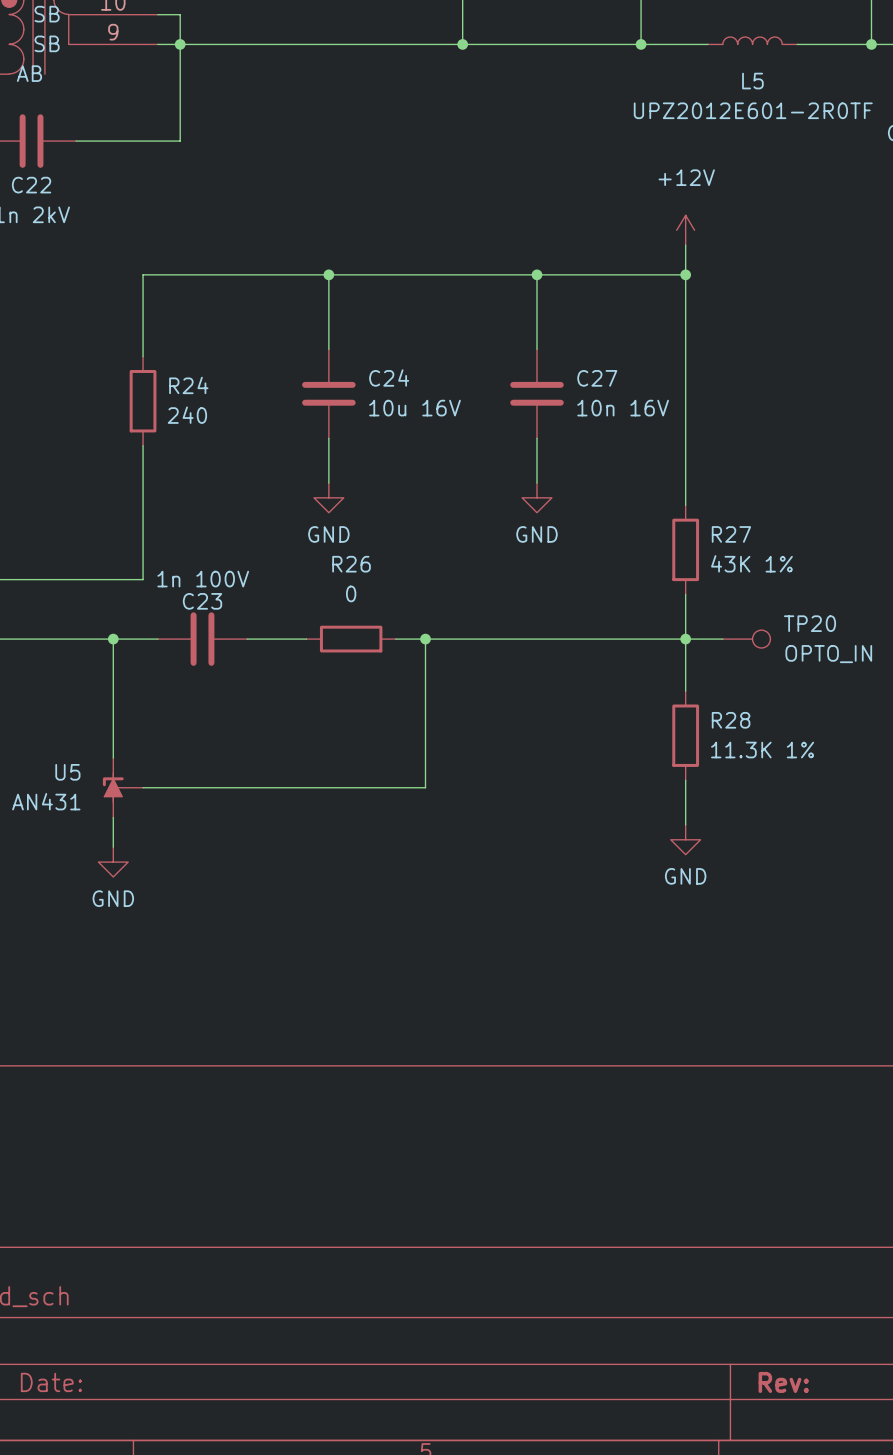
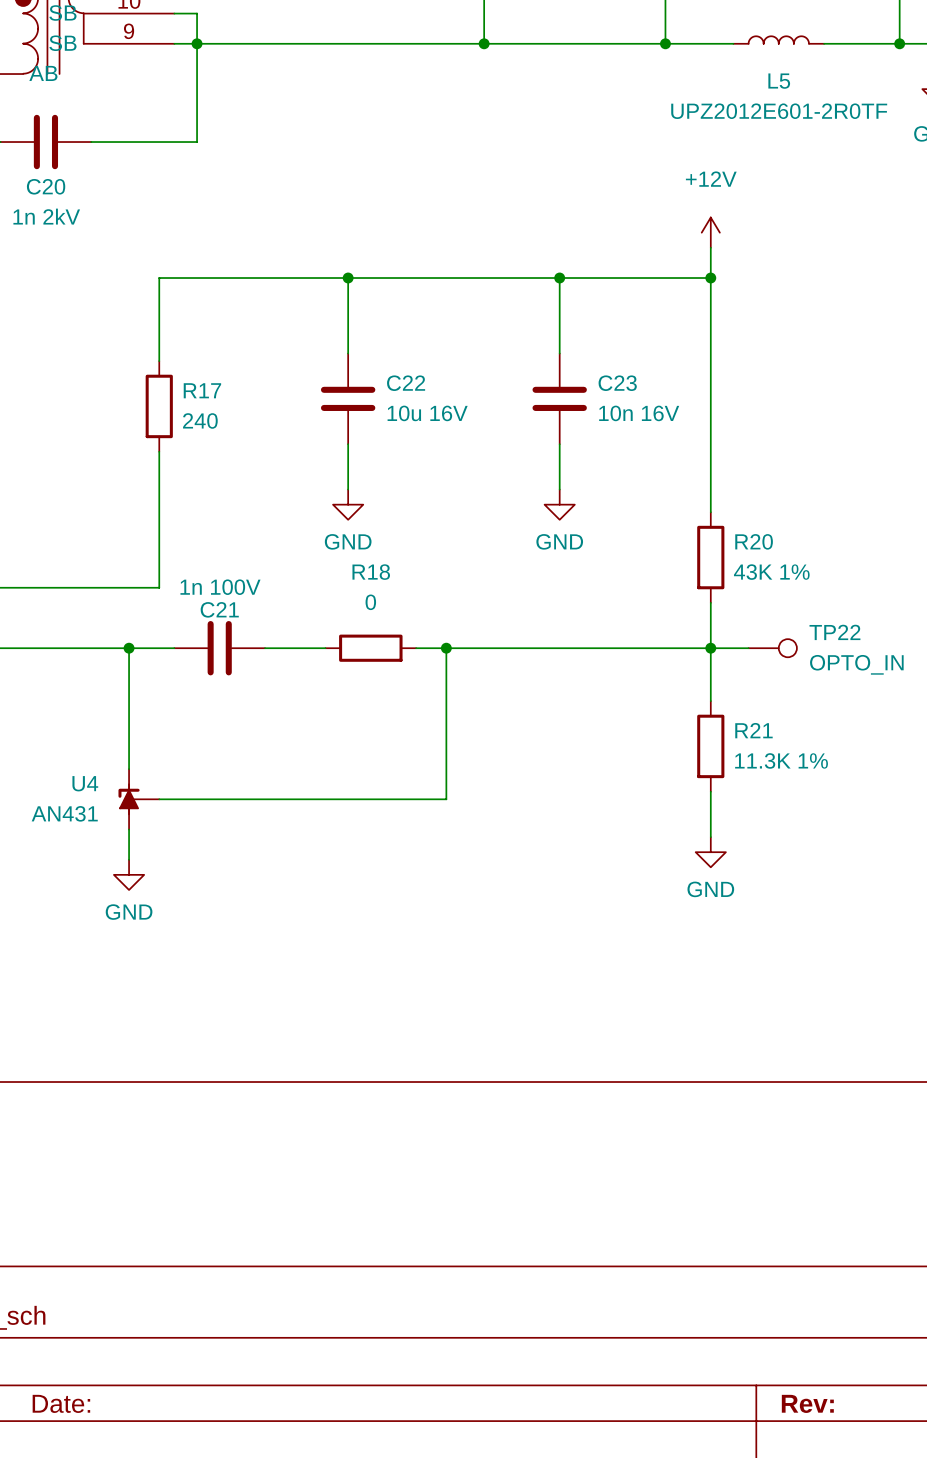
C22 name: C22 (31, 185) -> C20 (46, 186)
C24 name: C24 (389, 378) -> C22 (406, 383)
C27 name: C27 (597, 378) -> C23 (617, 383)
R24 name: R24 (188, 385) -> R17 (202, 390)
R27 name: R27 (731, 534) -> R20 (754, 541)
R26 name: R26 (351, 564) -> R18 (371, 572)
C23 name: C23 (202, 601) -> C21 (219, 609)
TP20 name: TP20 (810, 623) -> TP22 (834, 632)
R28 name: R28 (731, 720) -> R21 (753, 730)
U5 name: U5 (67, 772) -> U4 (85, 783)

